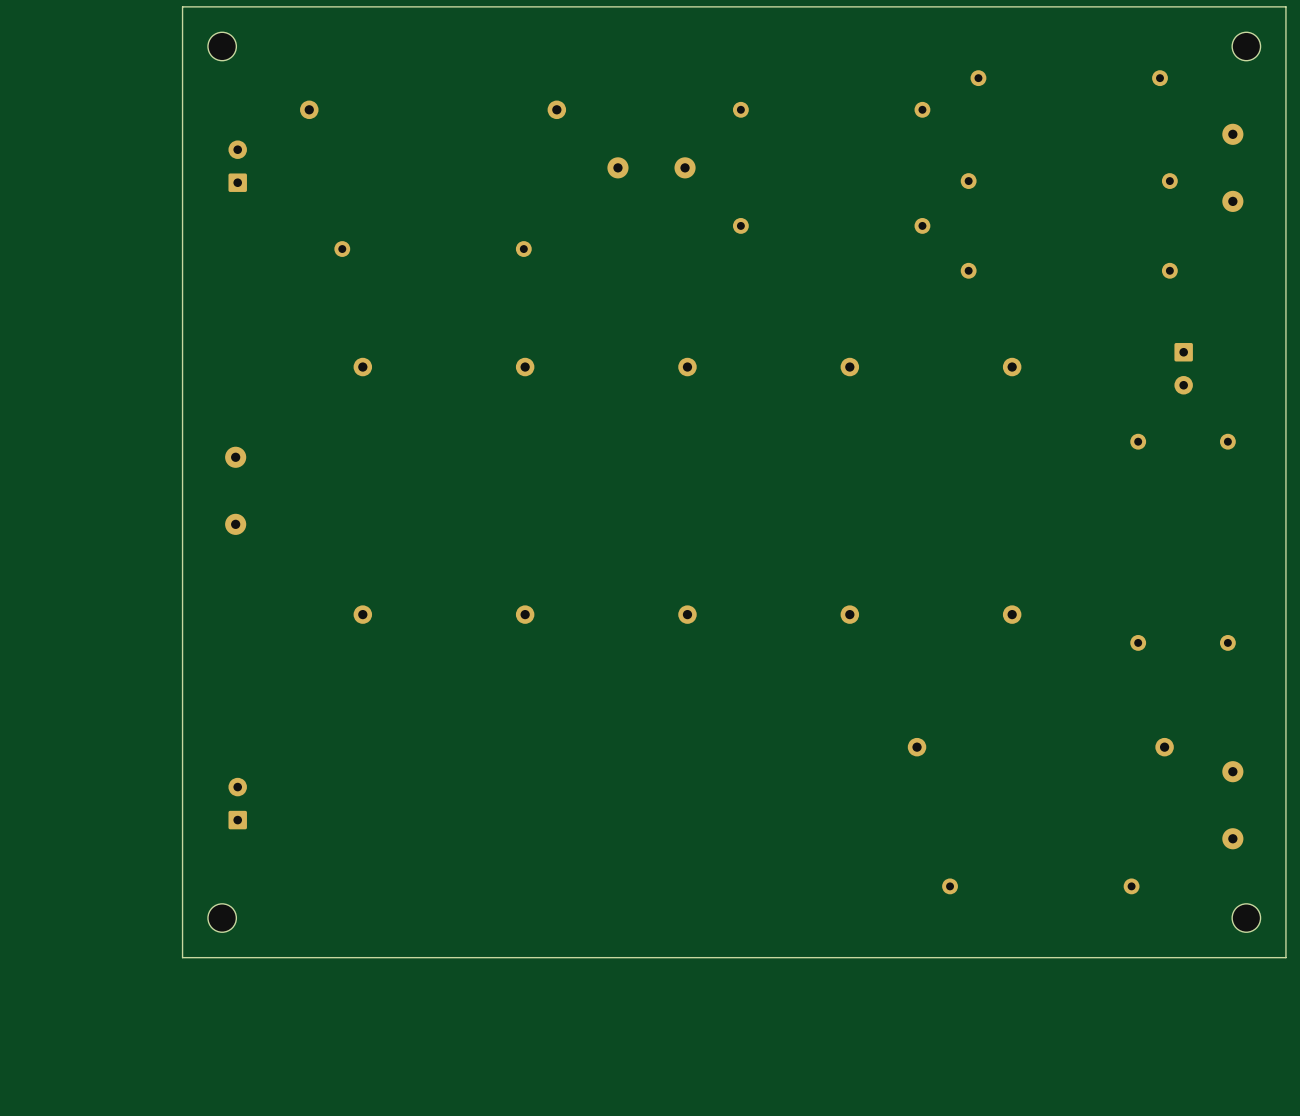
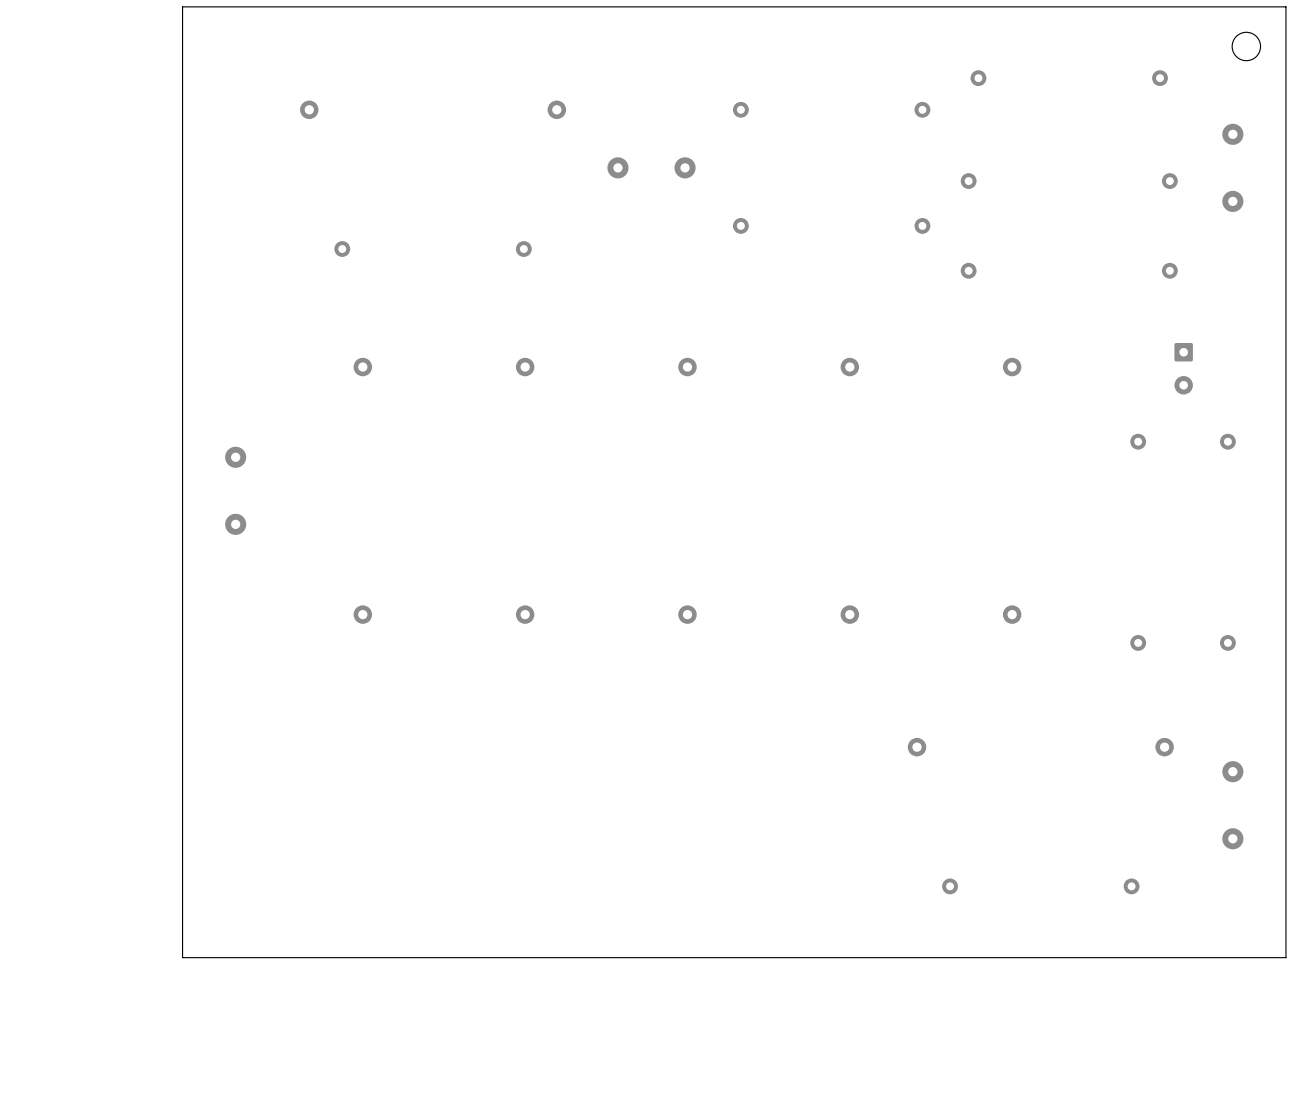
part: (222, 46) -> none
part: (237, 166) -> none
part: (237, 803) -> none
part: (222, 918) -> none
part: (1246, 918) -> none

